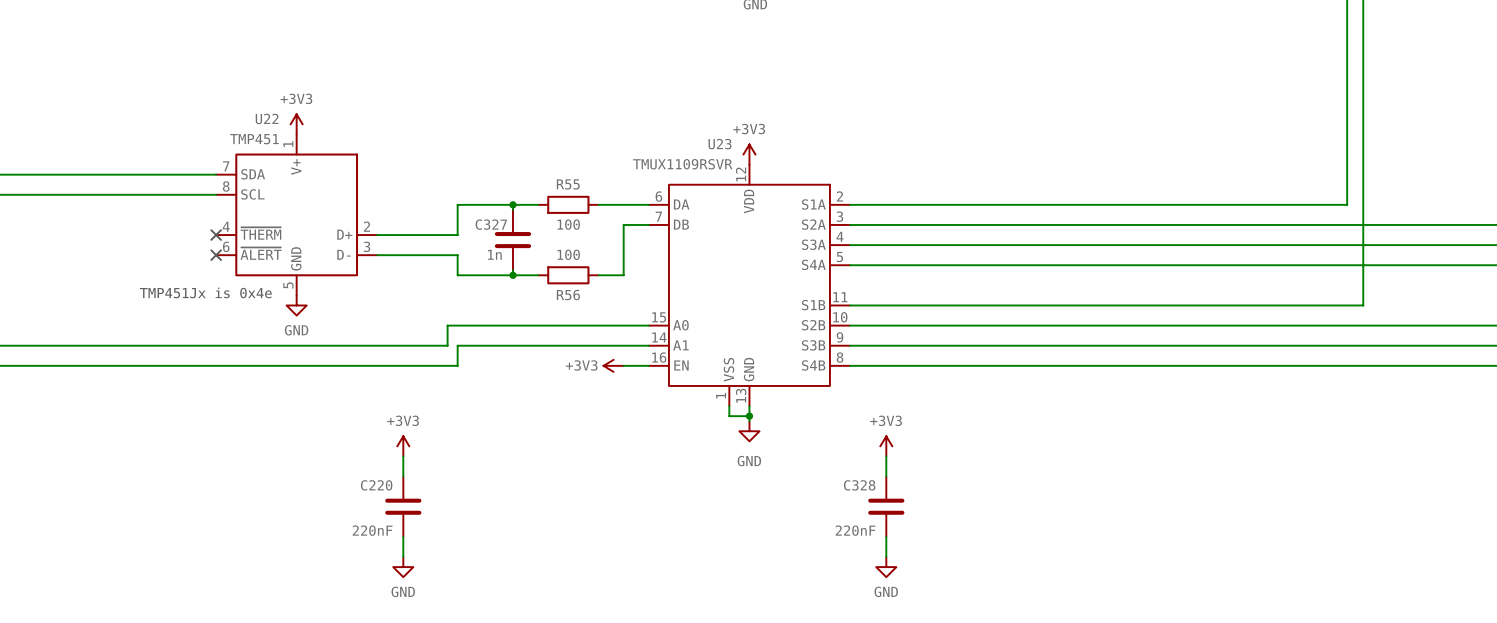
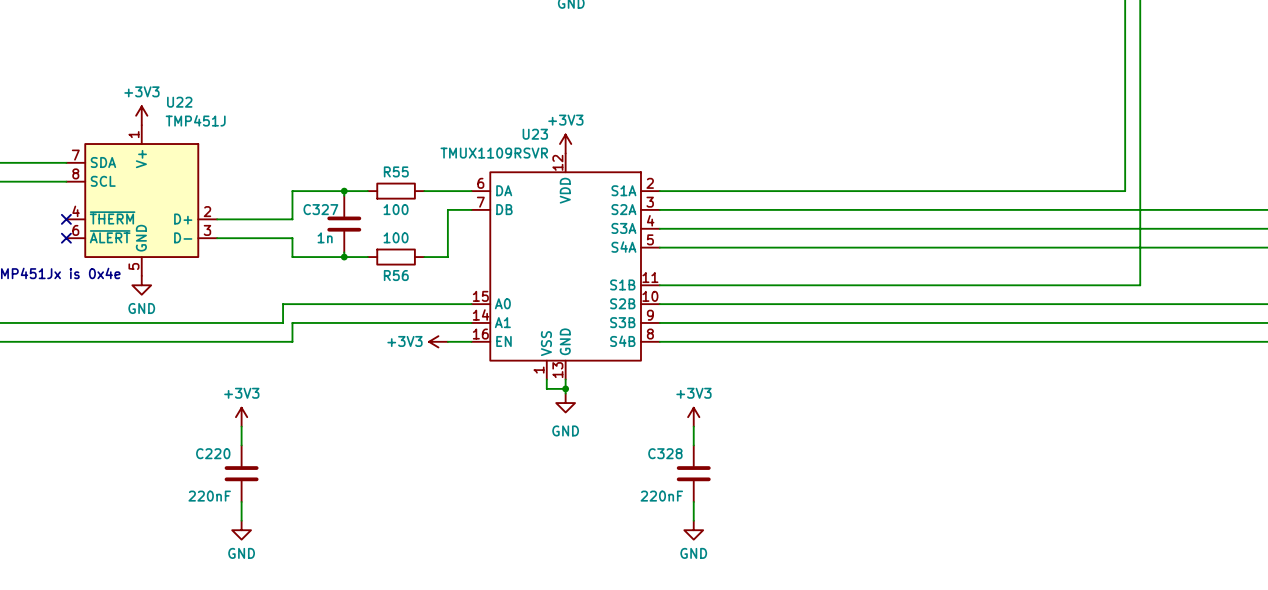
U22 name position: U22 (267, 118) -> U22 (179, 102)
U22 value: TMP451 (254, 139) -> TMP451J (195, 120)

